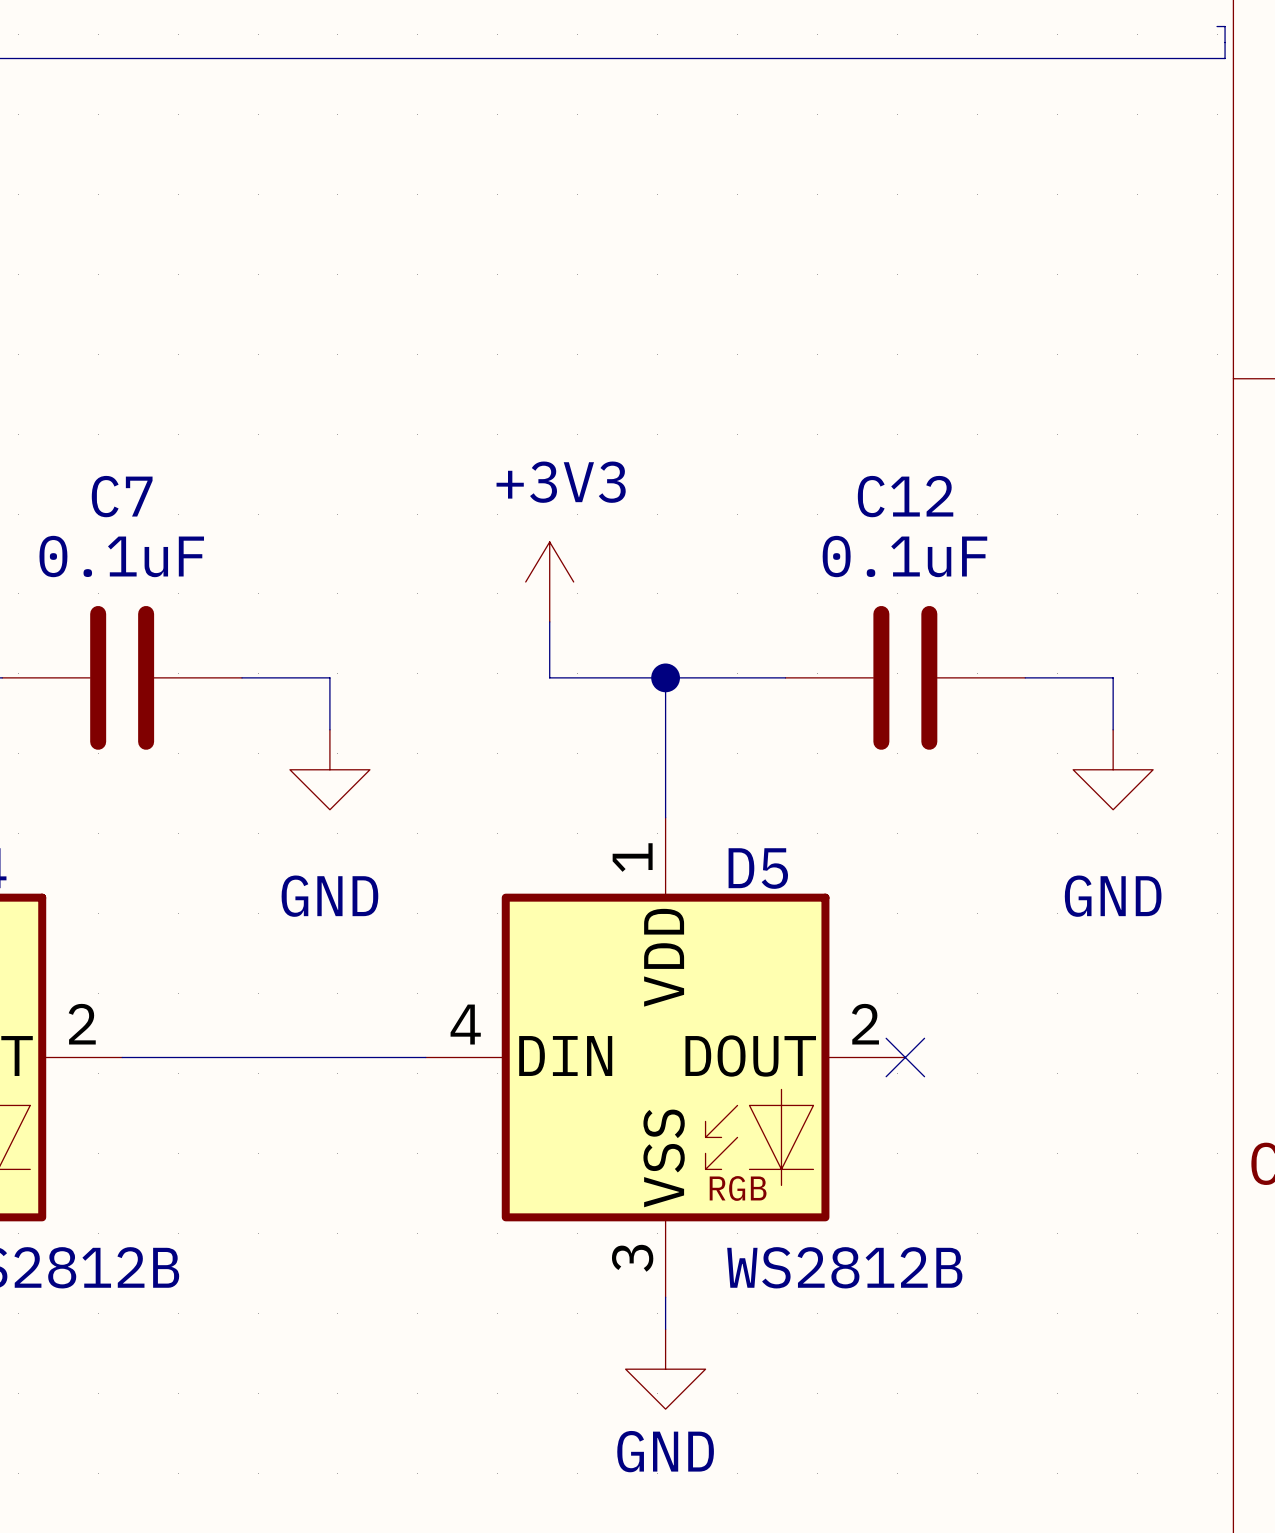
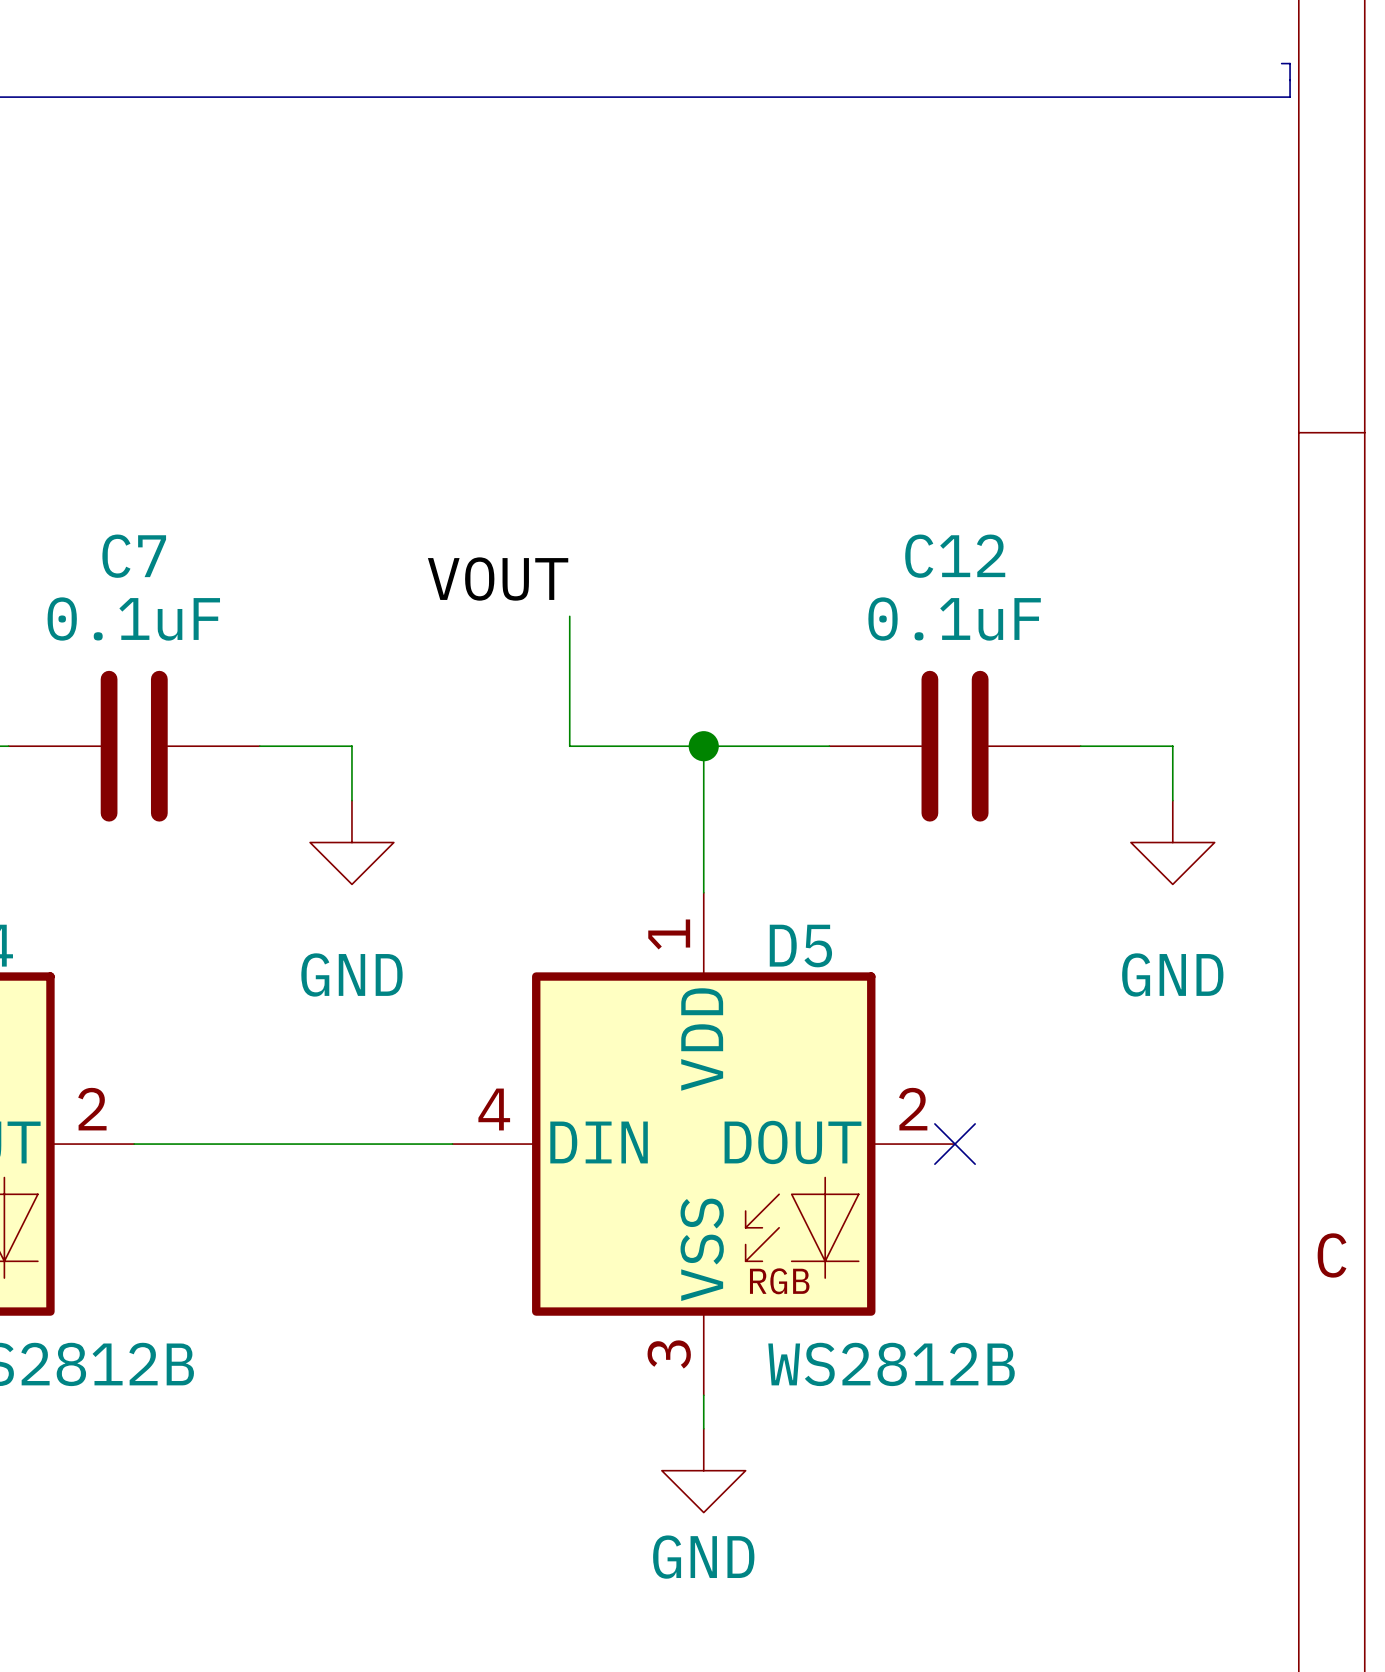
label: none -> VOUT (498, 579)
power symbol: +3V3 (549, 581) -> none
wire: (549, 621) (549, 677) -> (569, 616) (569, 746) (582, 746)

